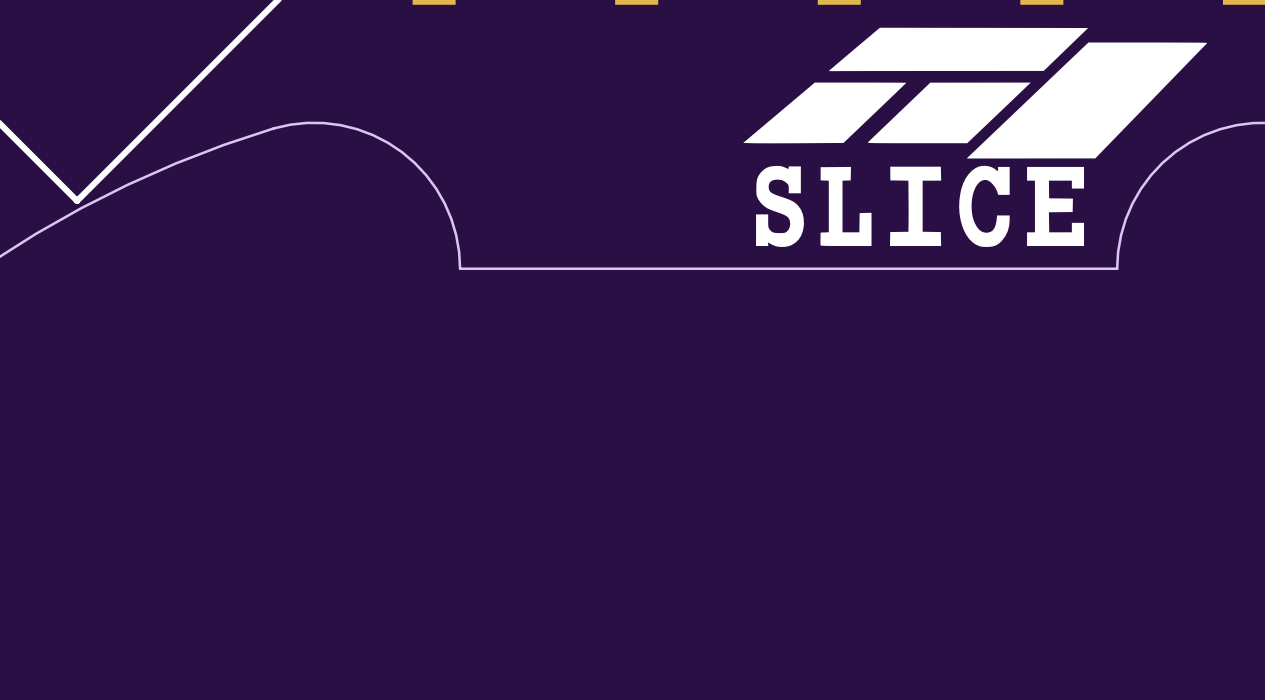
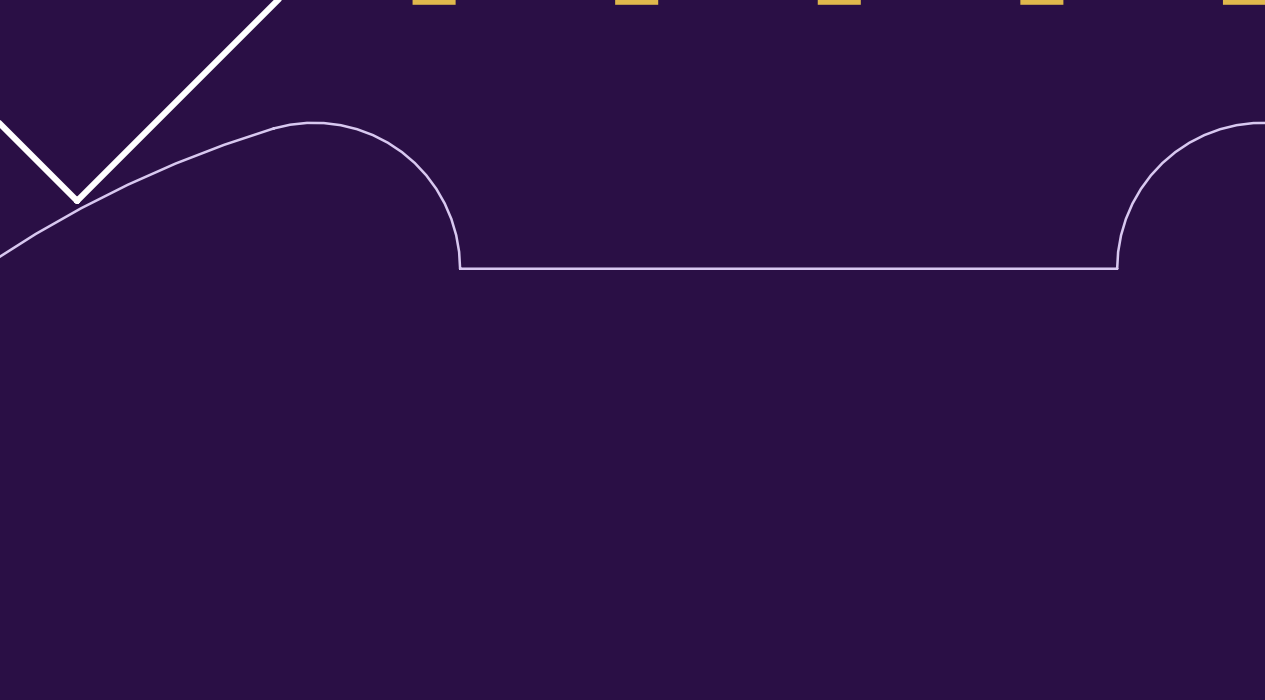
drawing: [743, 27, 1207, 247] -> none

